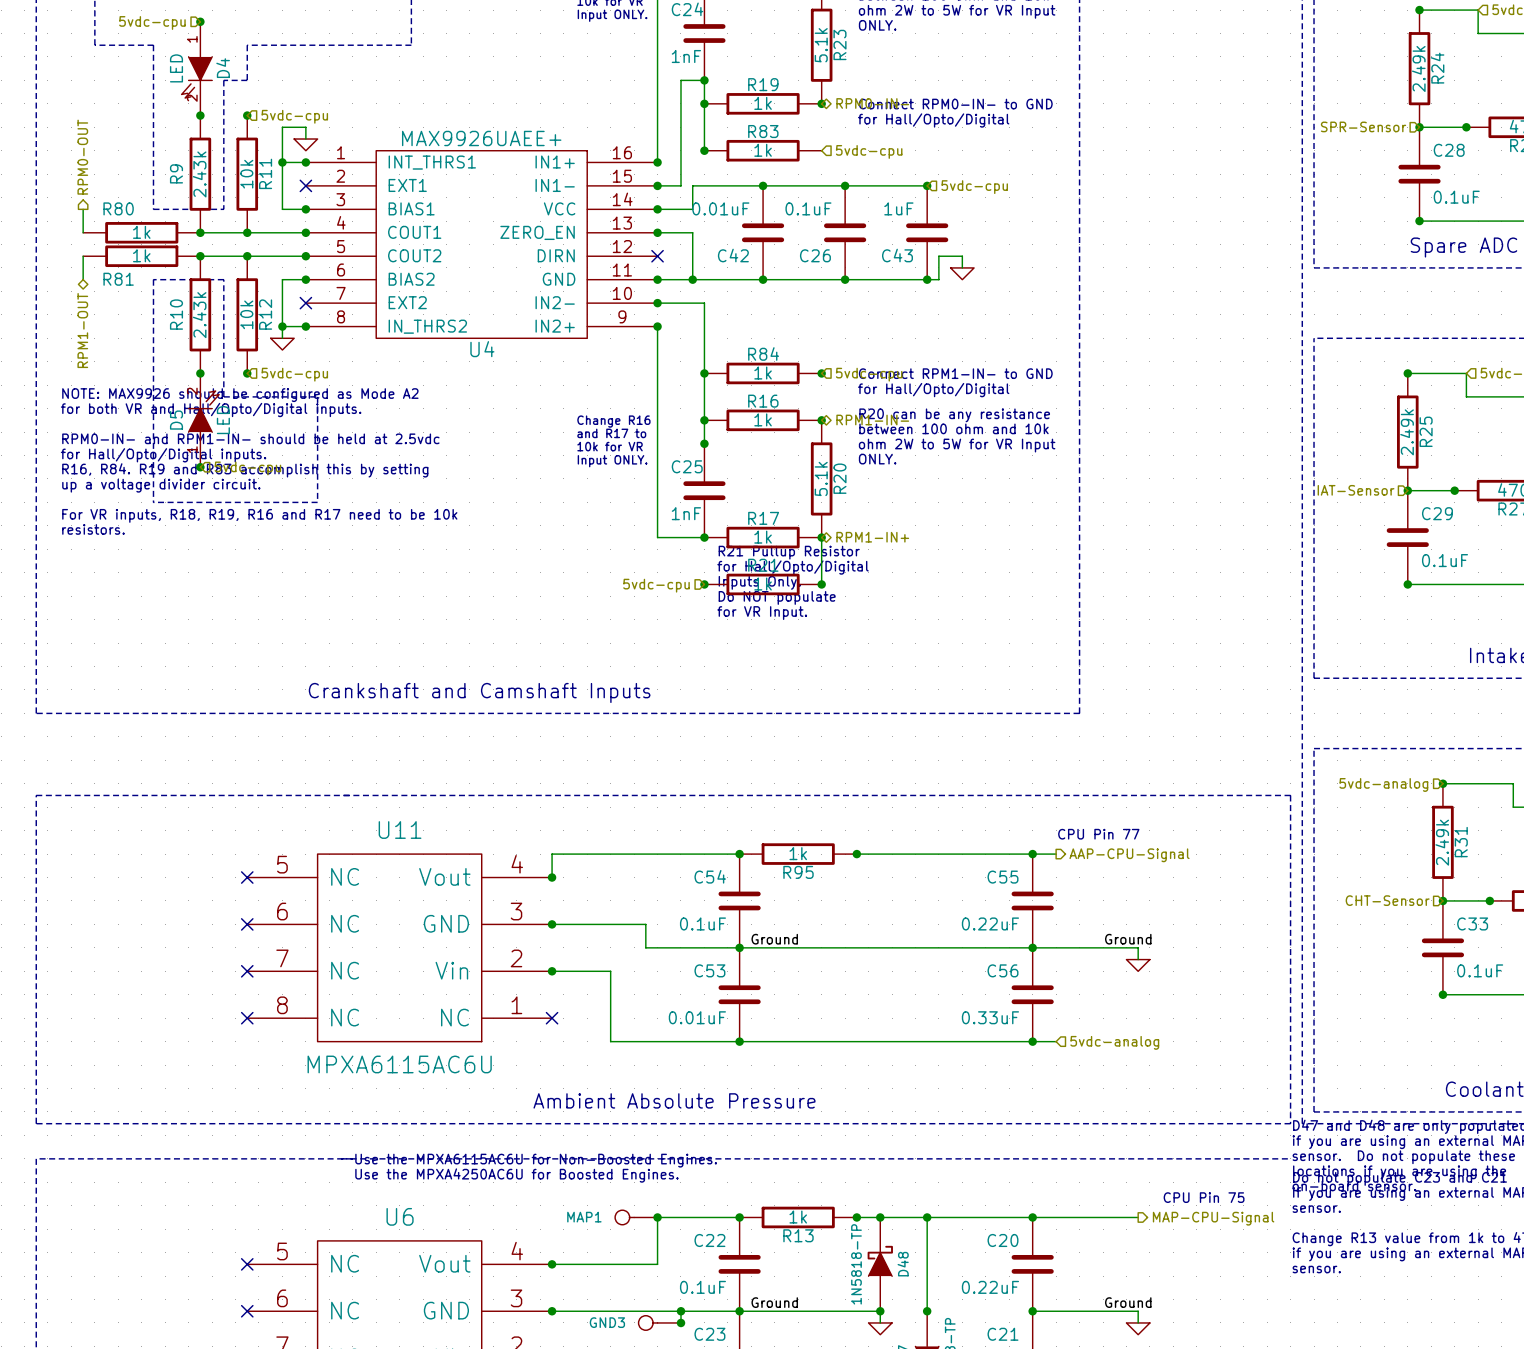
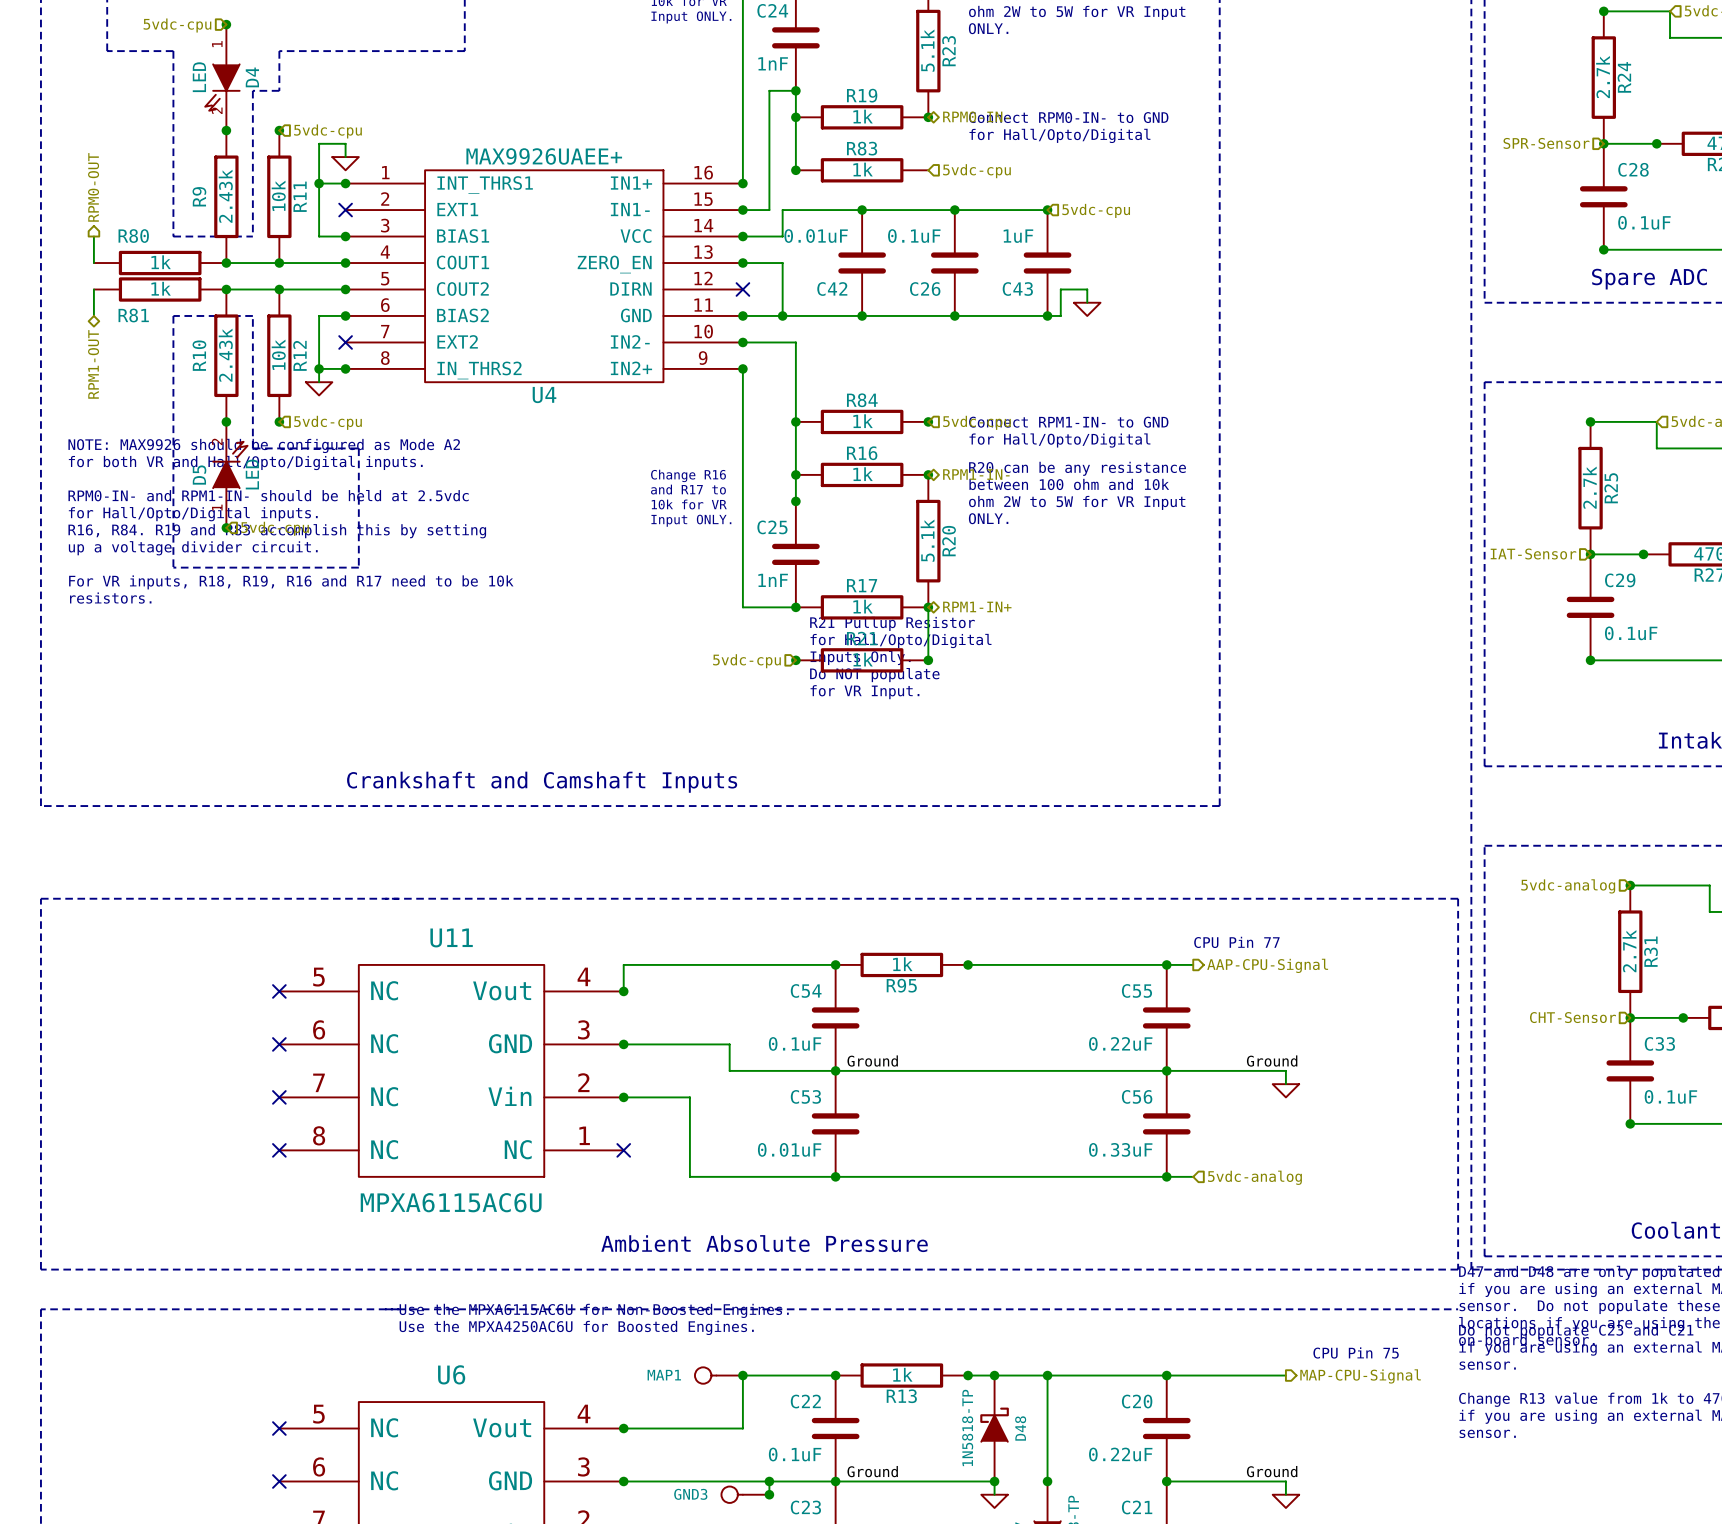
R24 value: 2.49k (1418, 68) -> 2.7k (1603, 77)
R25 value: 2.49k (1407, 432) -> 2.7k (1589, 487)
R31 value: 2.49k (1442, 842) -> 2.7k (1629, 951)

